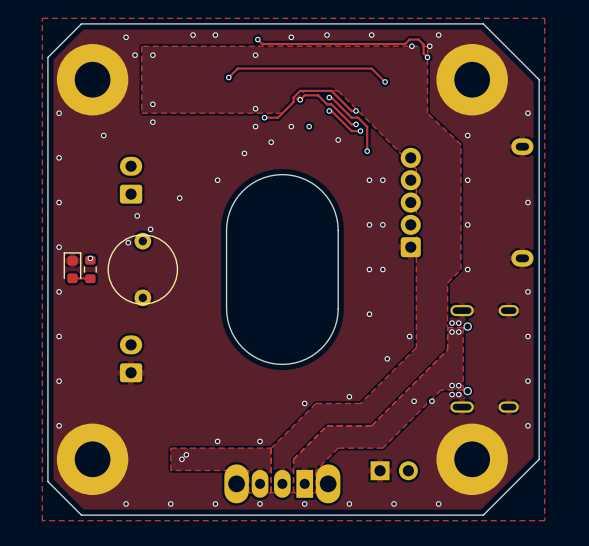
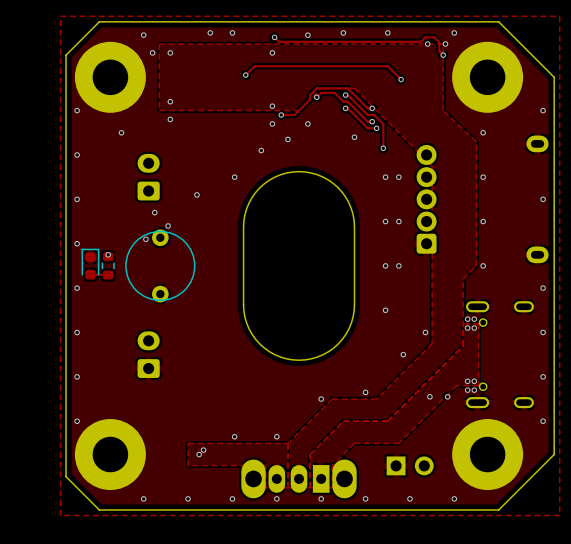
via: (309, 126) -> none

